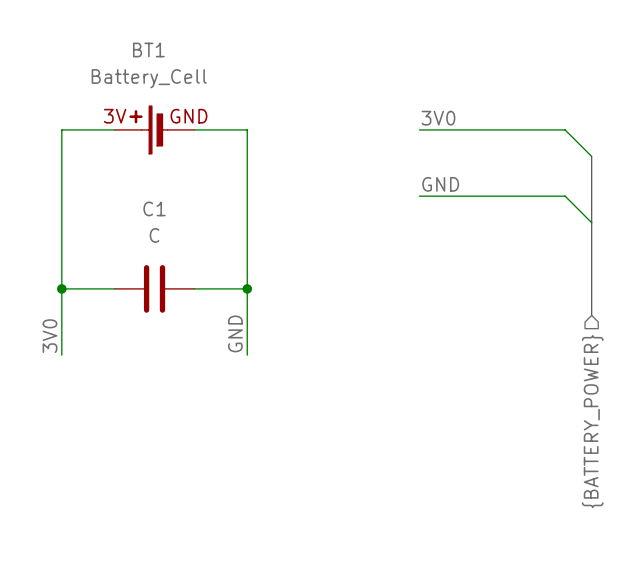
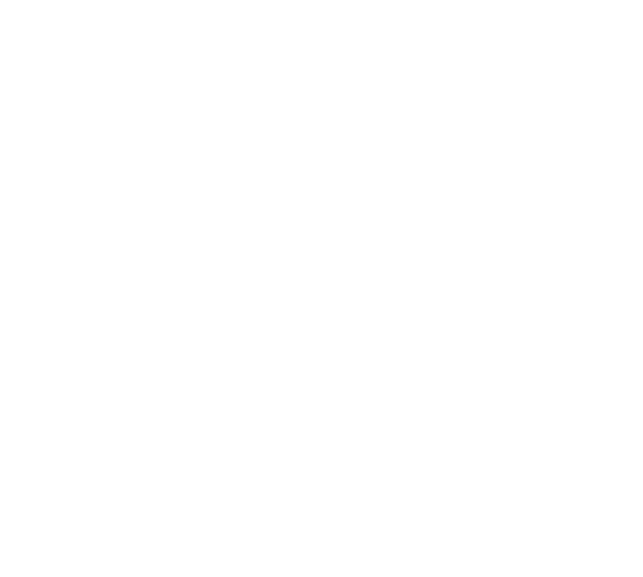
label: 3V0 (438, 118) -> none
wire: (114, 129) (61, 129) (61, 355) -> none
BT1: Battery_Cell (154, 129) -> none
wire: (194, 129) (247, 129) (247, 355) -> none
wire: (419, 129) (565, 129) (591, 156) -> none
bus: (591, 156) (591, 315) -> none
label: GND (440, 184) -> none
wire: (419, 196) (565, 196) (591, 222) -> none
wire: (61, 288) (114, 288) -> none
junction: (61, 288) -> none
C1: C (154, 288) -> none
wire: (194, 288) (247, 288) -> none
junction: (247, 288) -> none
label: GND (235, 333) -> none
label: 3V0 (49, 336) -> none
hierarchical label: {BATTERY_POWER} (592, 421) -> none

